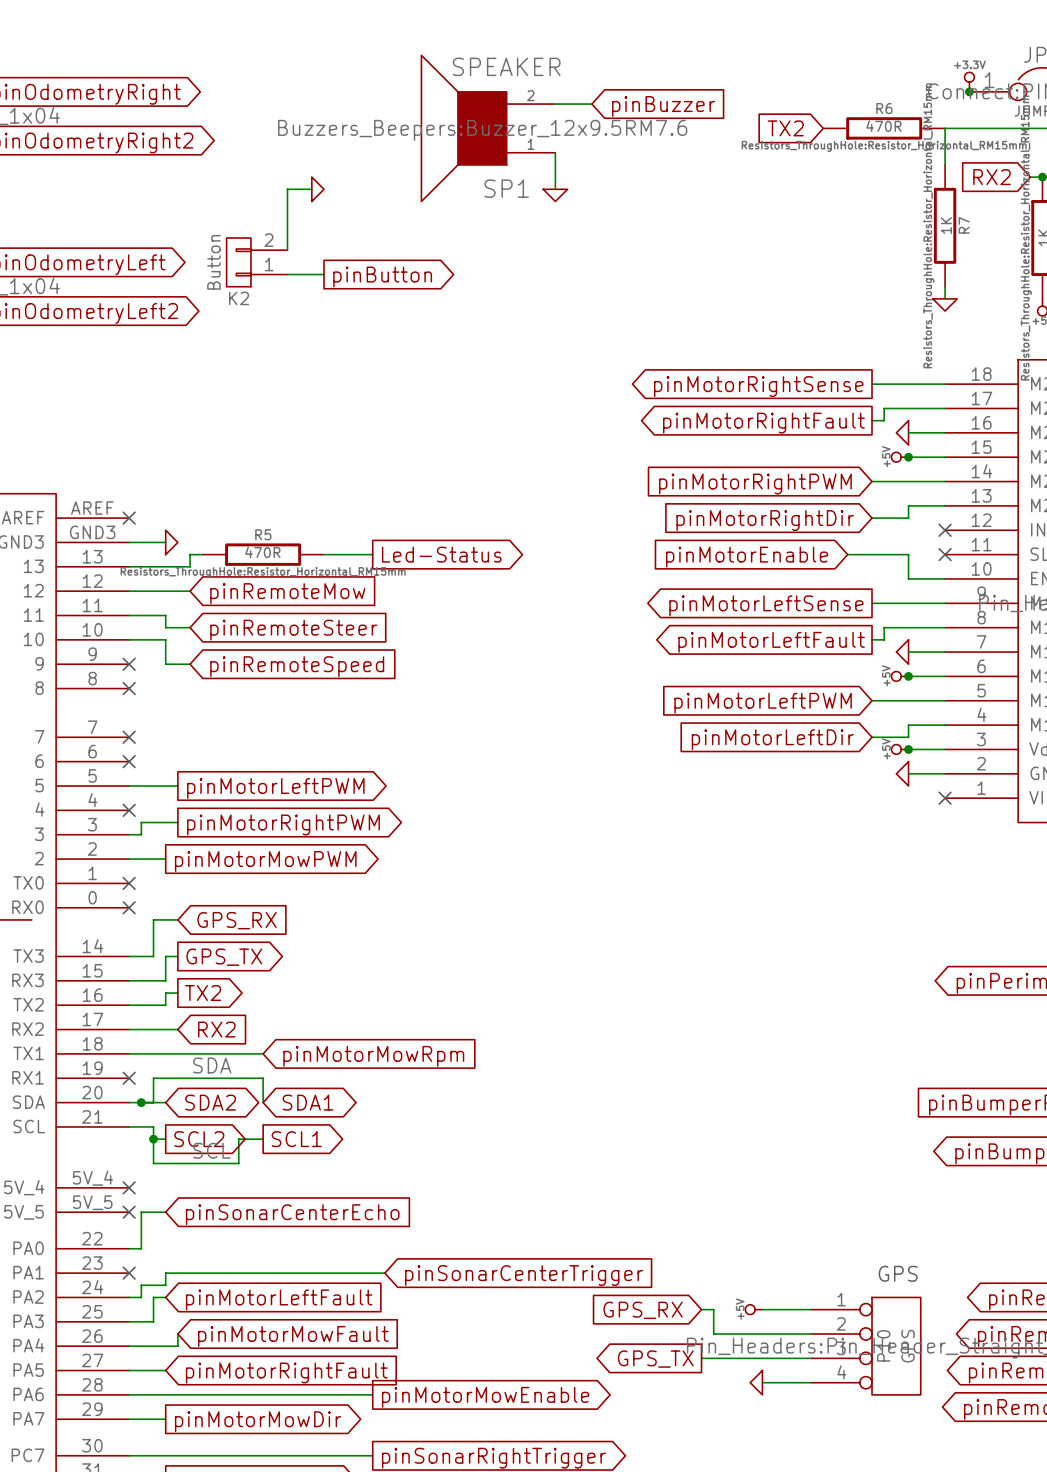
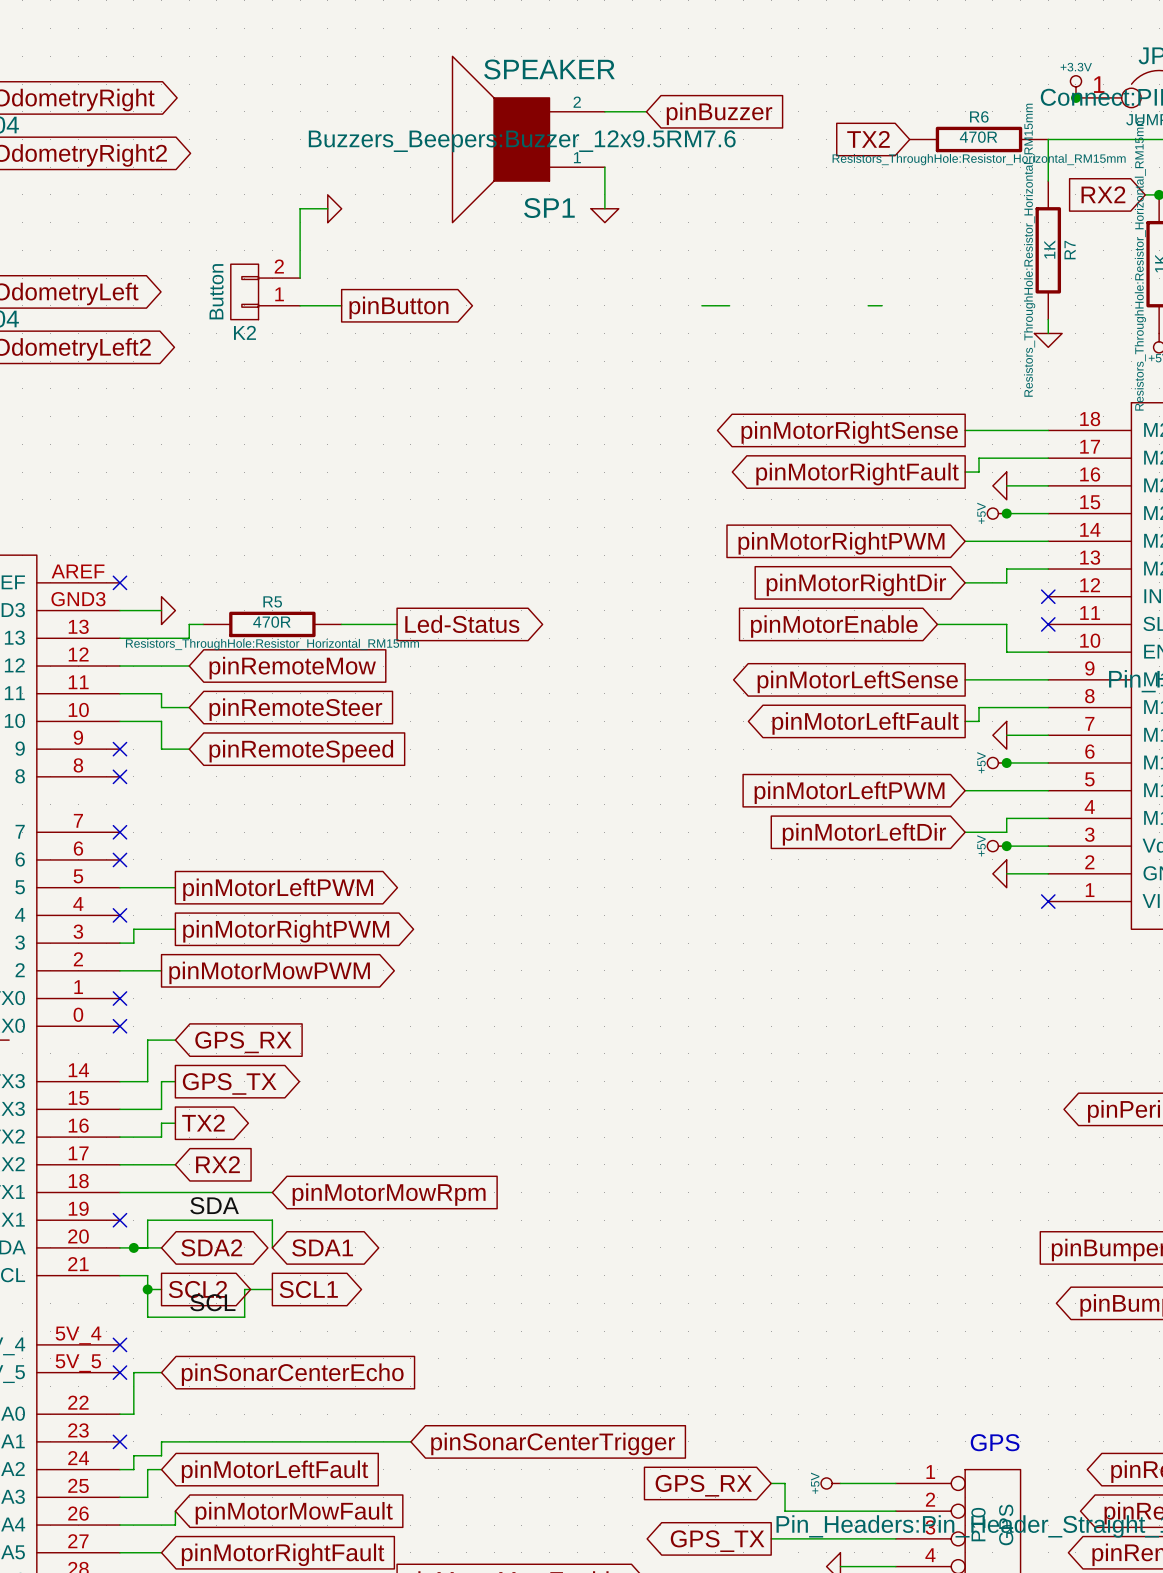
wire: none -> (701, 305) (729, 305)
wire: none -> (868, 305) (882, 305)

